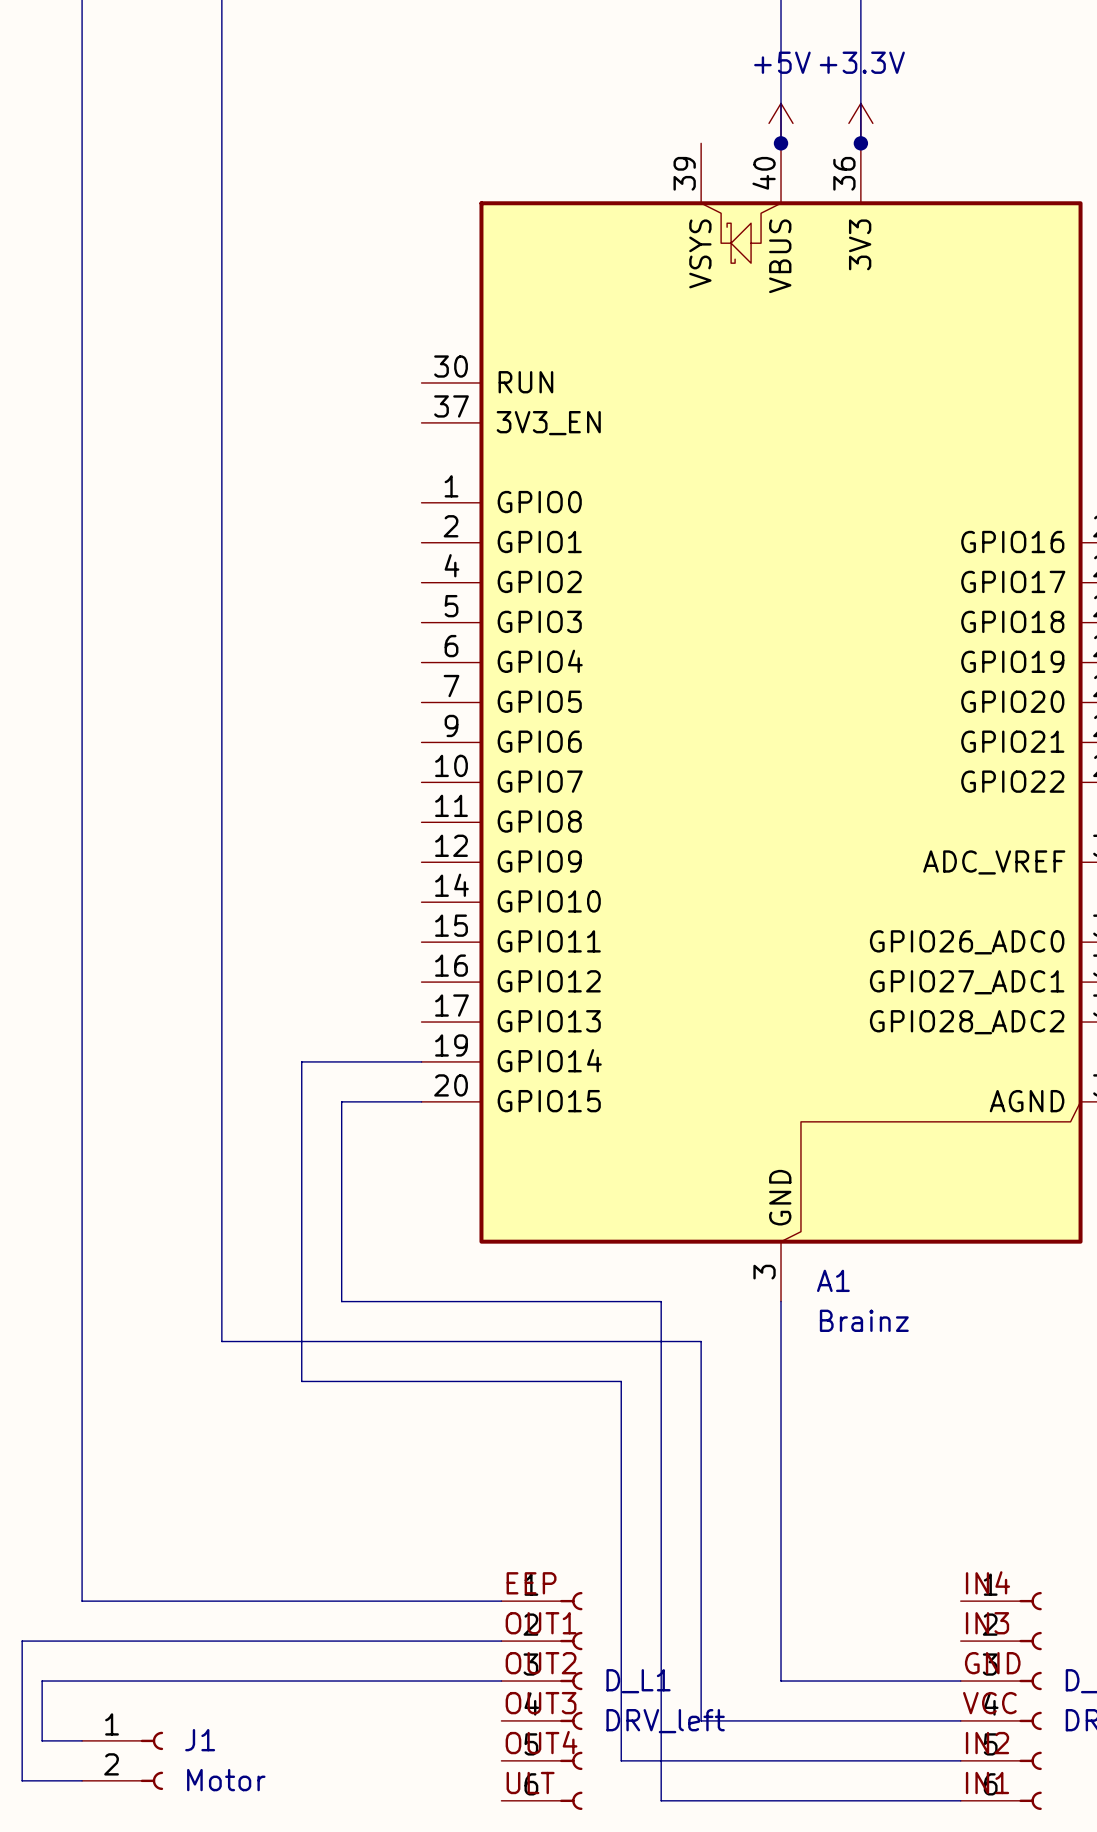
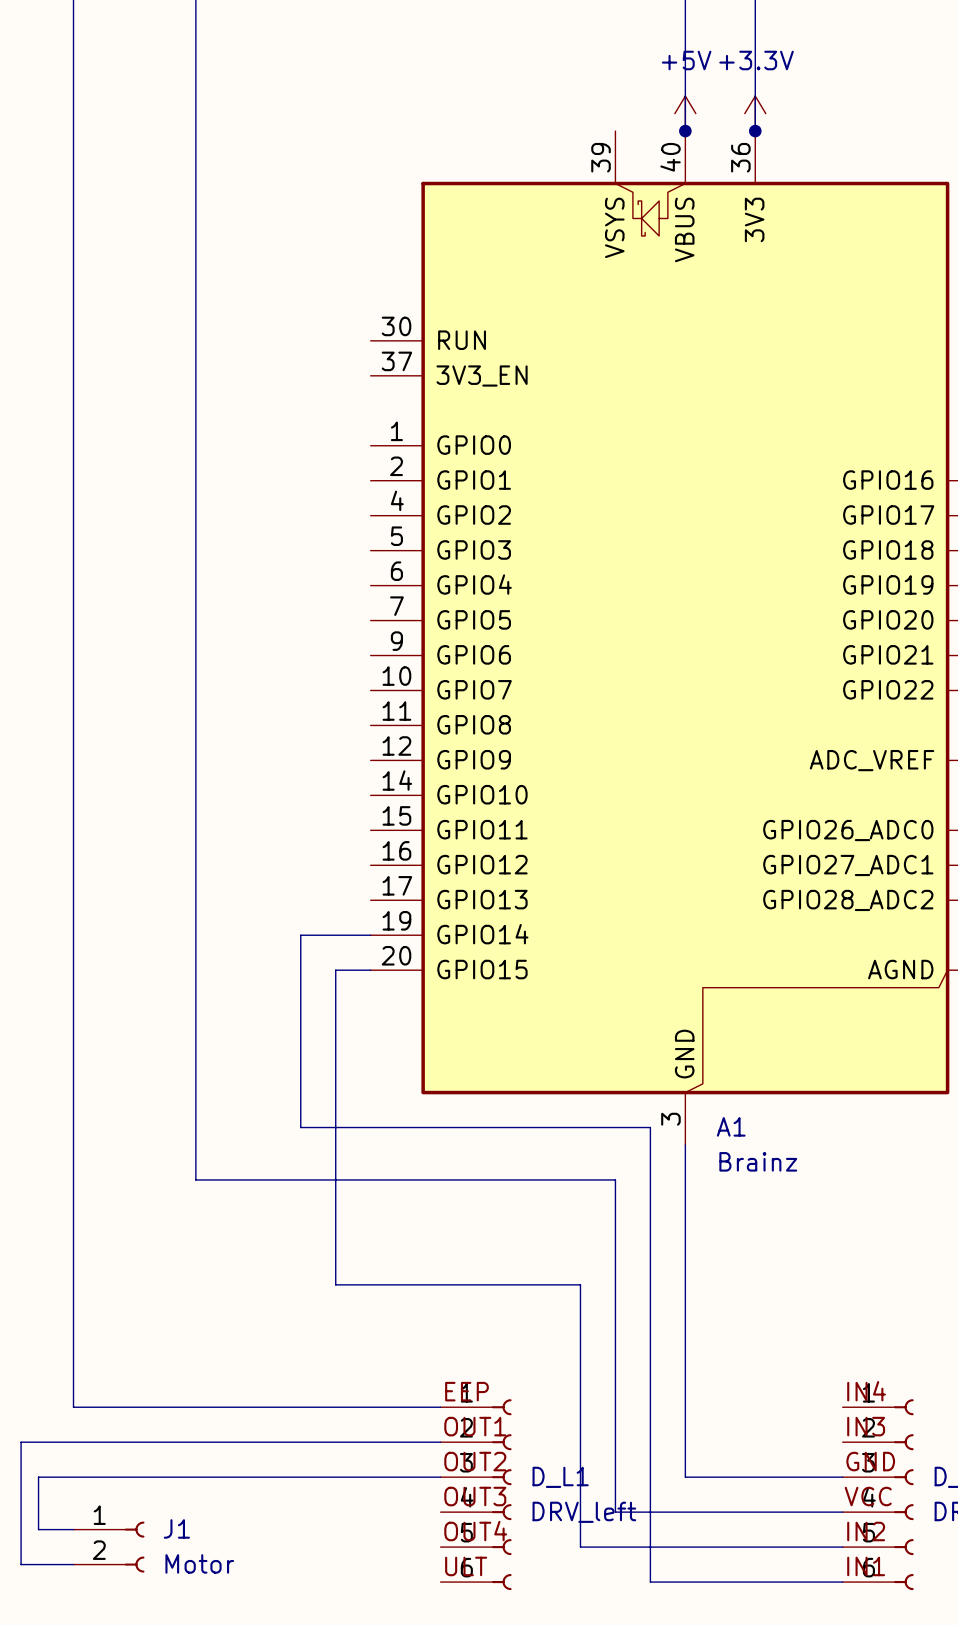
wire: (341, 1061) (301, 1061) (301, 1381) (621, 1381) (621, 1760) (661, 1760) (661, 1800) (741, 1800) -> (300, 1127) (650, 1127) (650, 1582)
wire: (341, 1101) (381, 1101) -> (300, 970) (300, 935)
wire: (341, 1281) (341, 1301) (661, 1301) (661, 1461) -> (335, 970) (335, 1284) (580, 1284)

